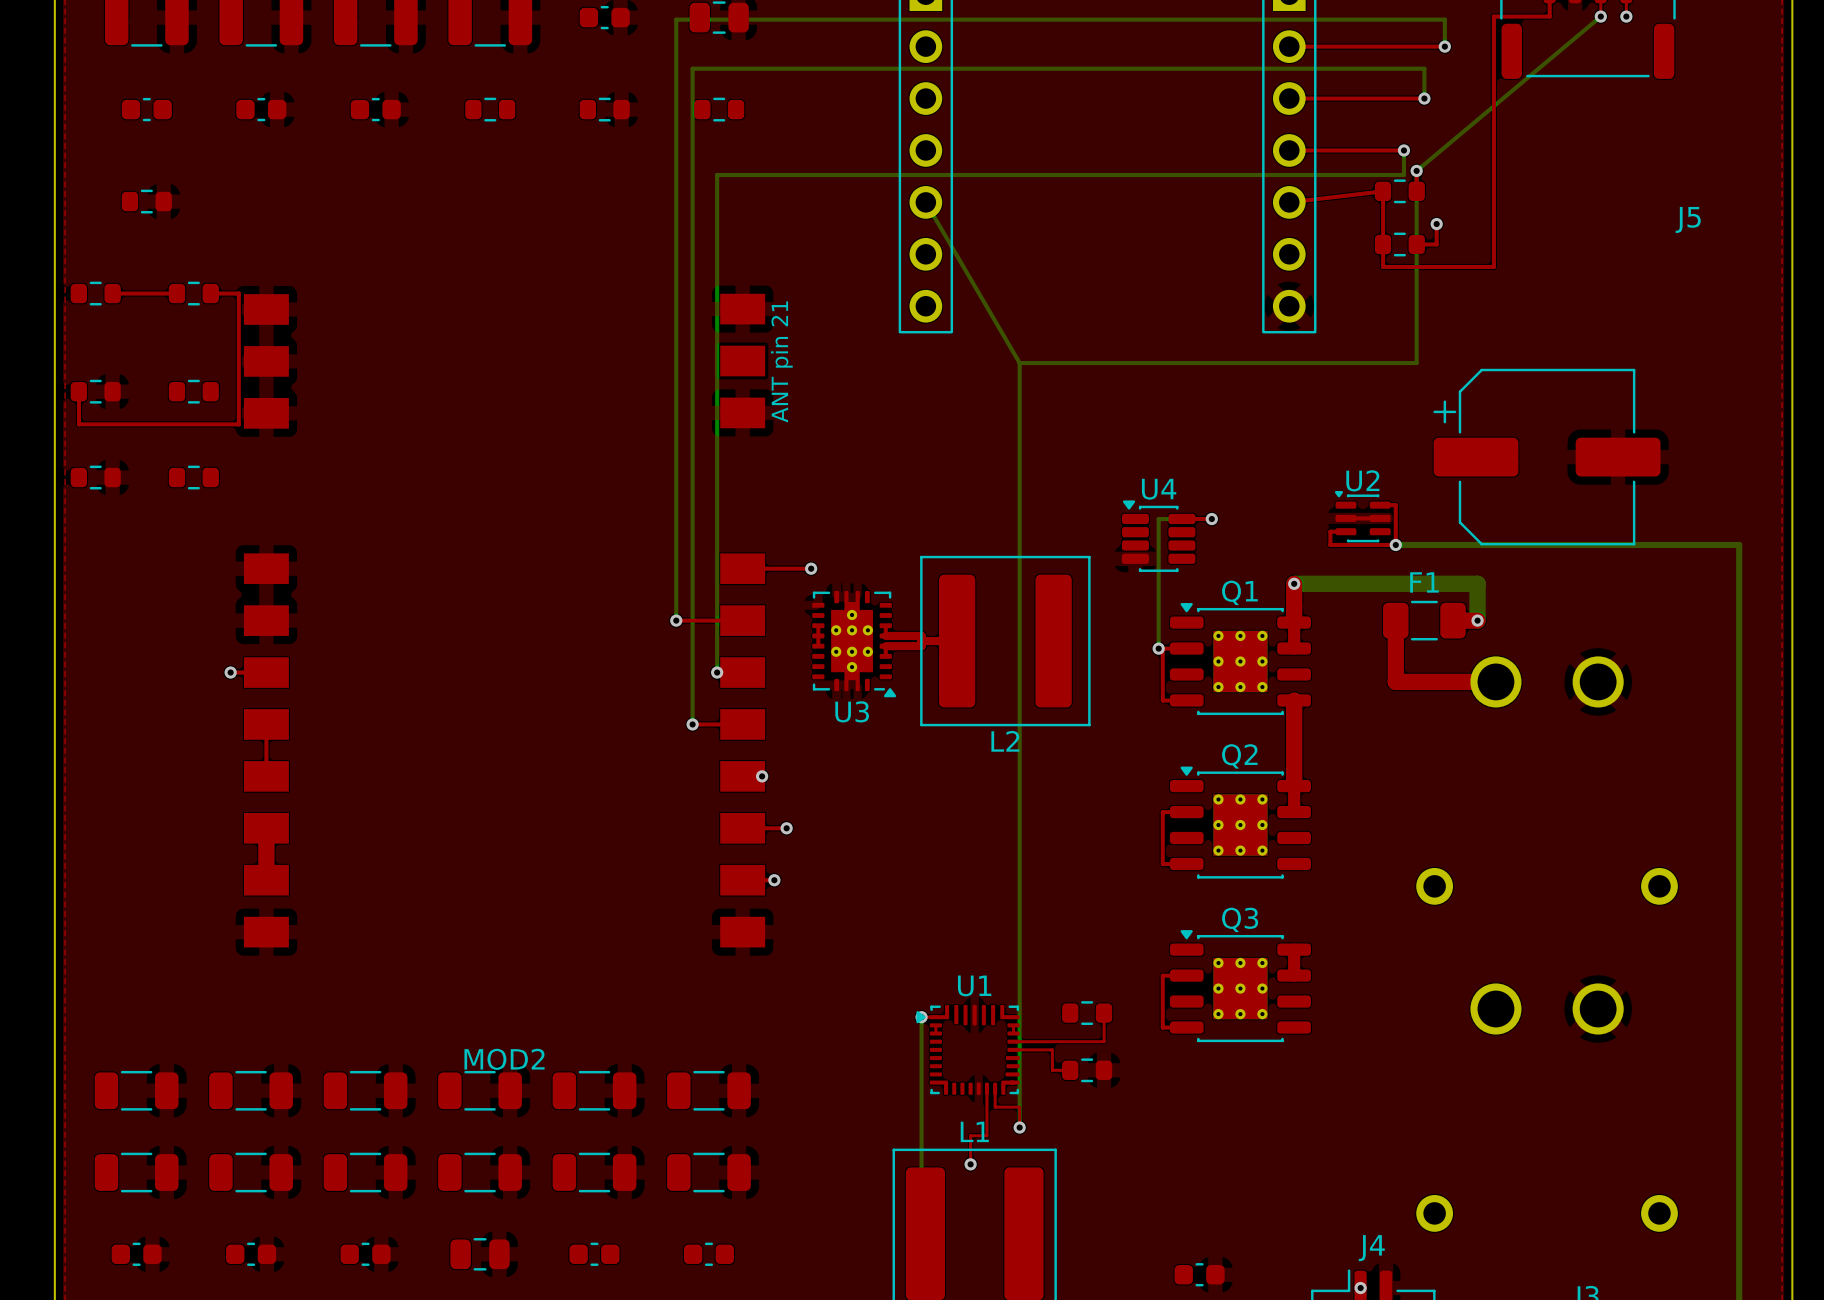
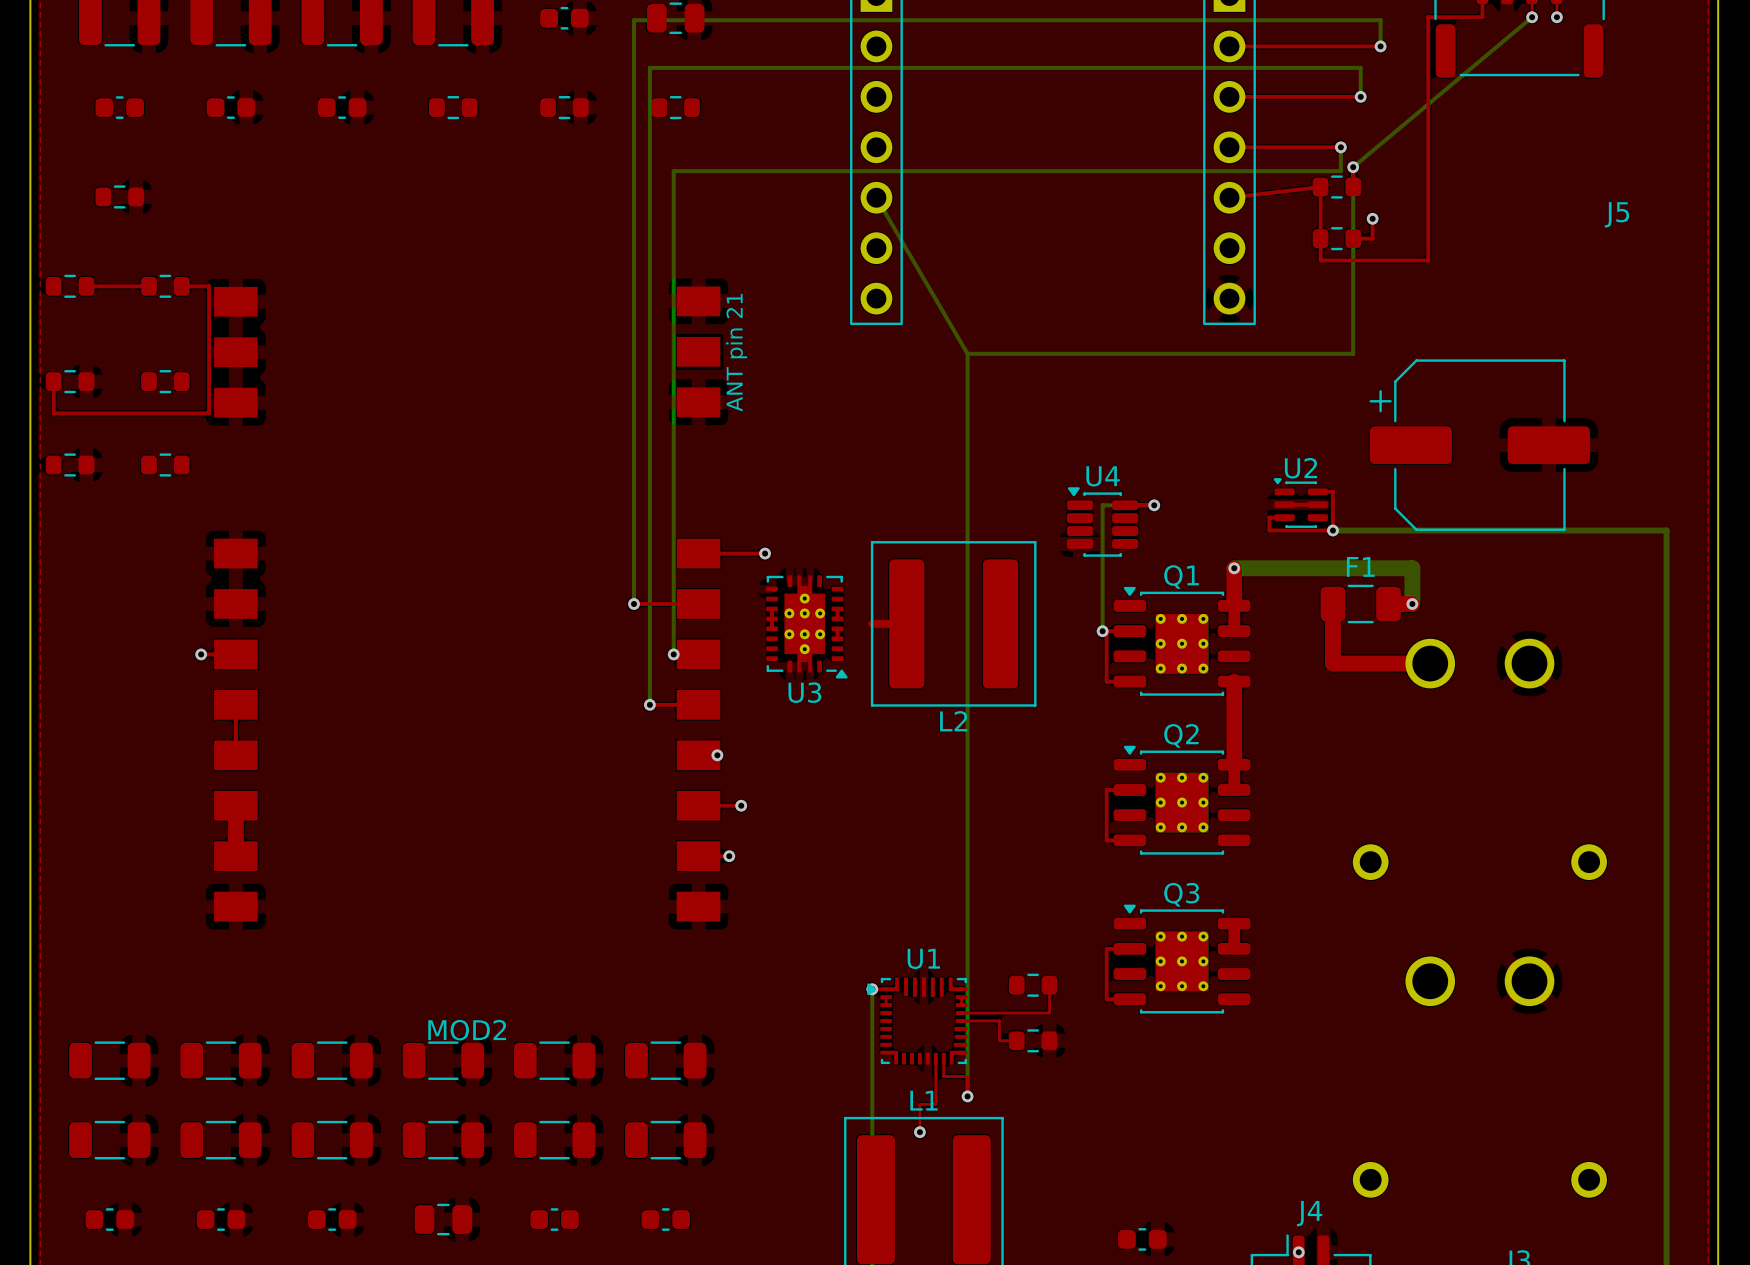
top track: (885, 635) (921, 635) (921, 646) (885, 646) -> none

